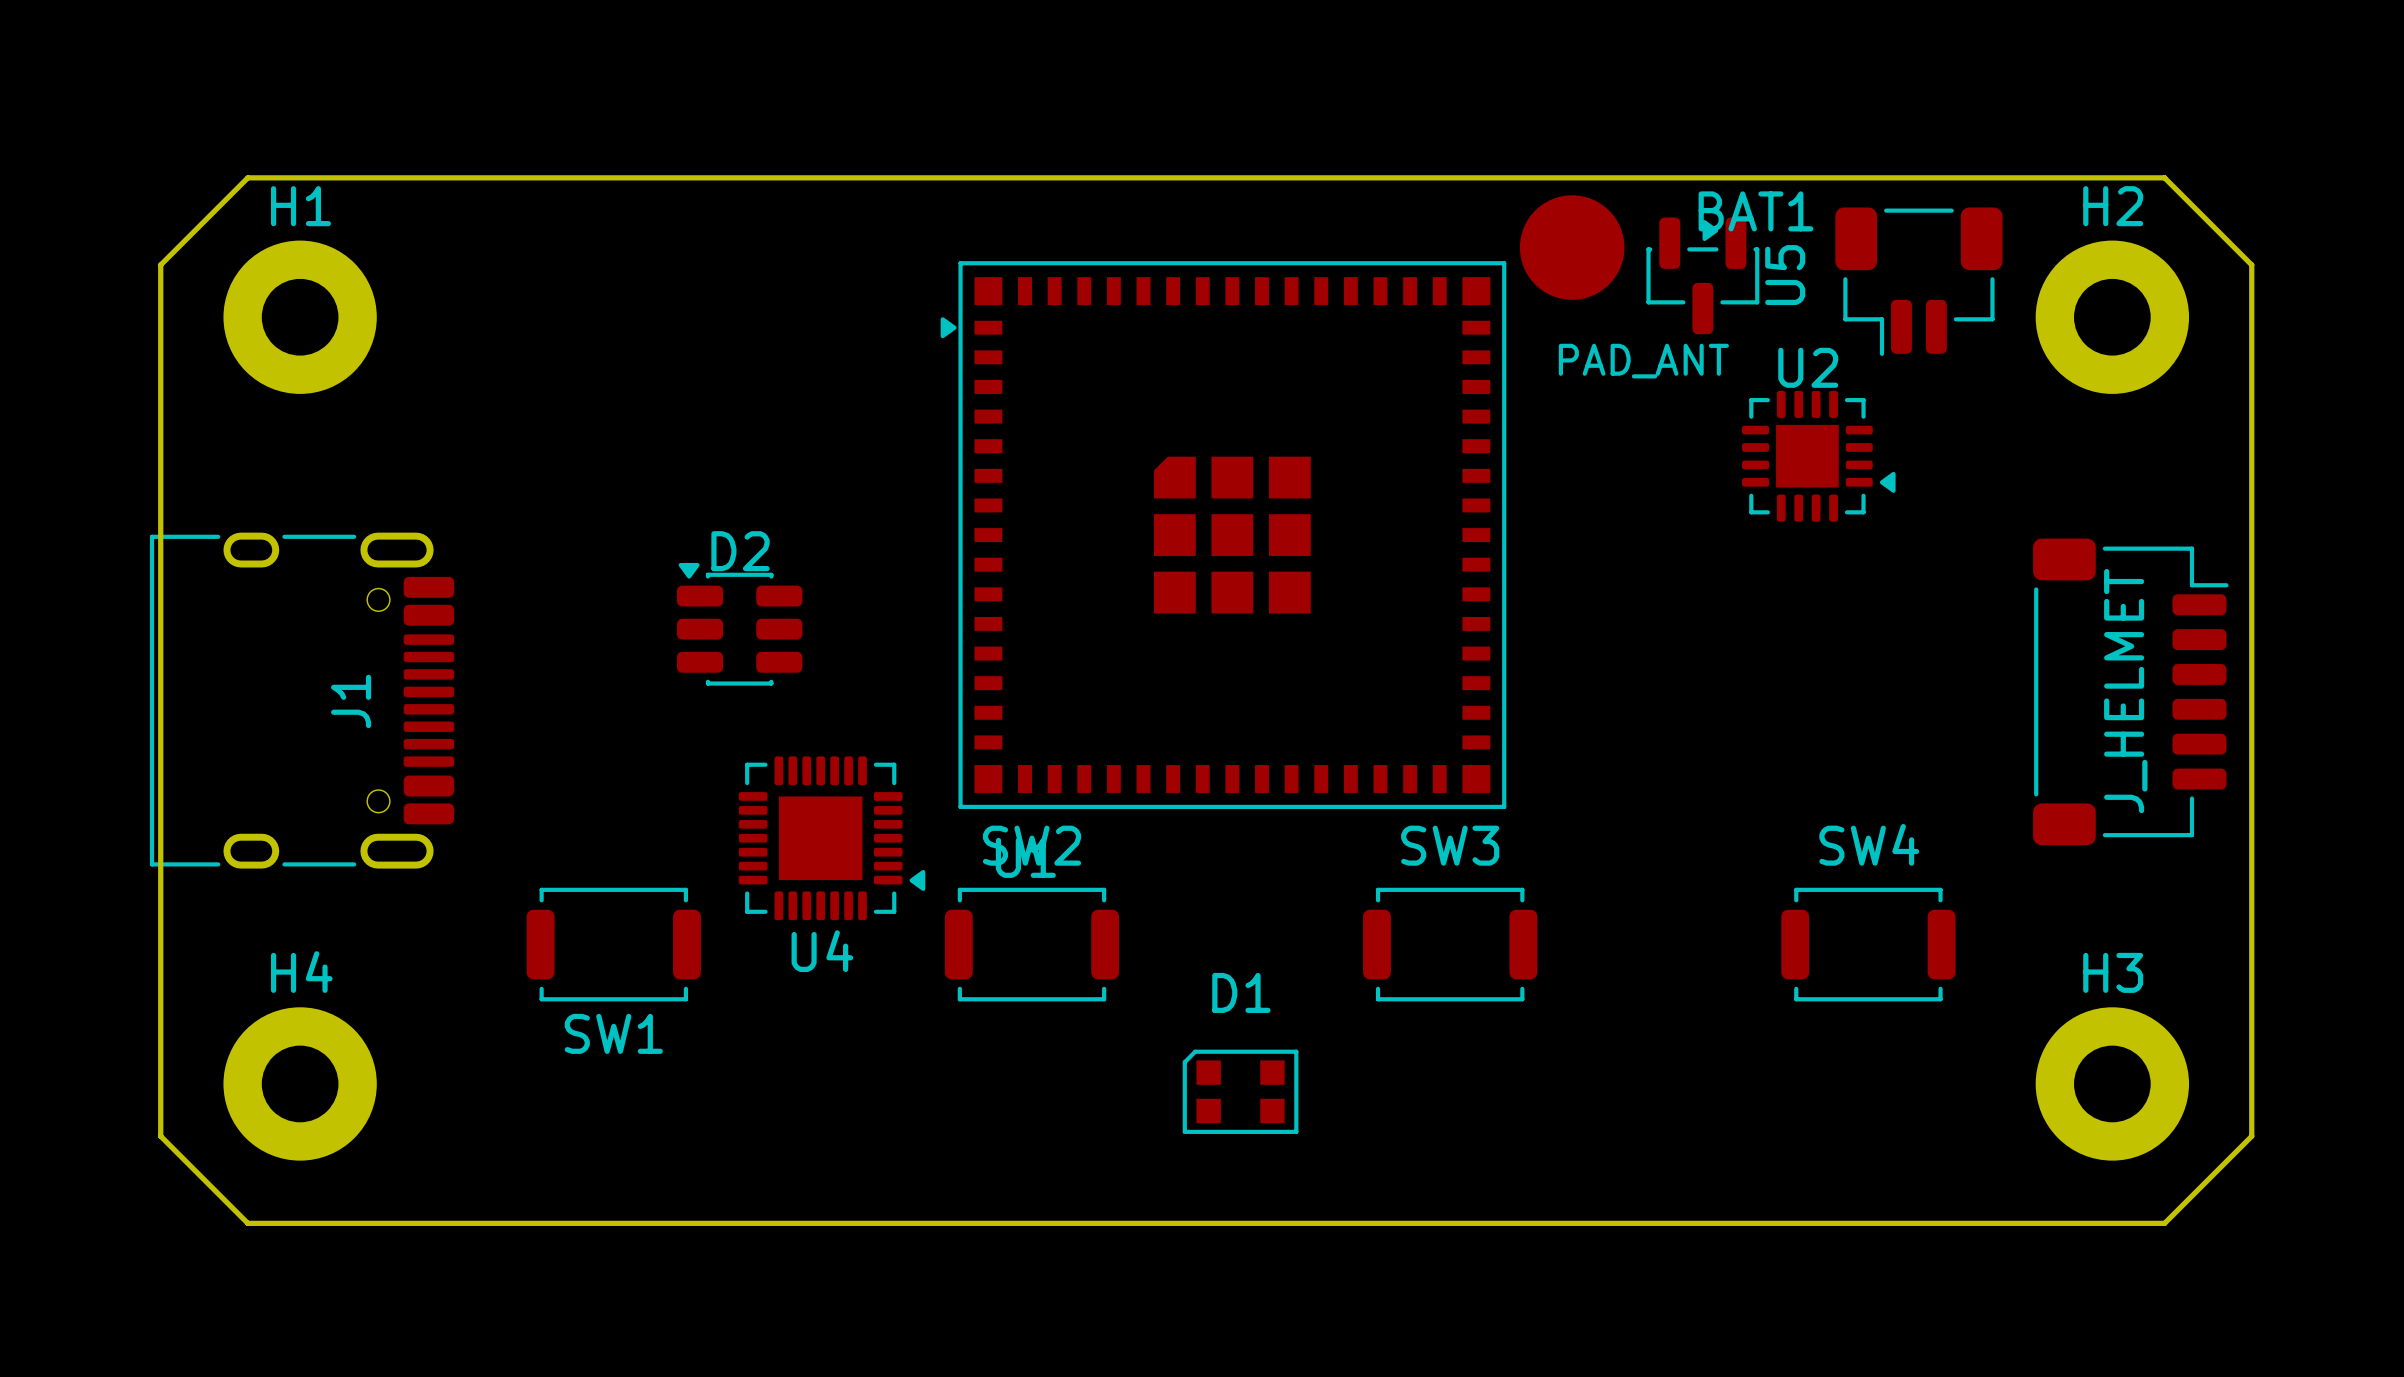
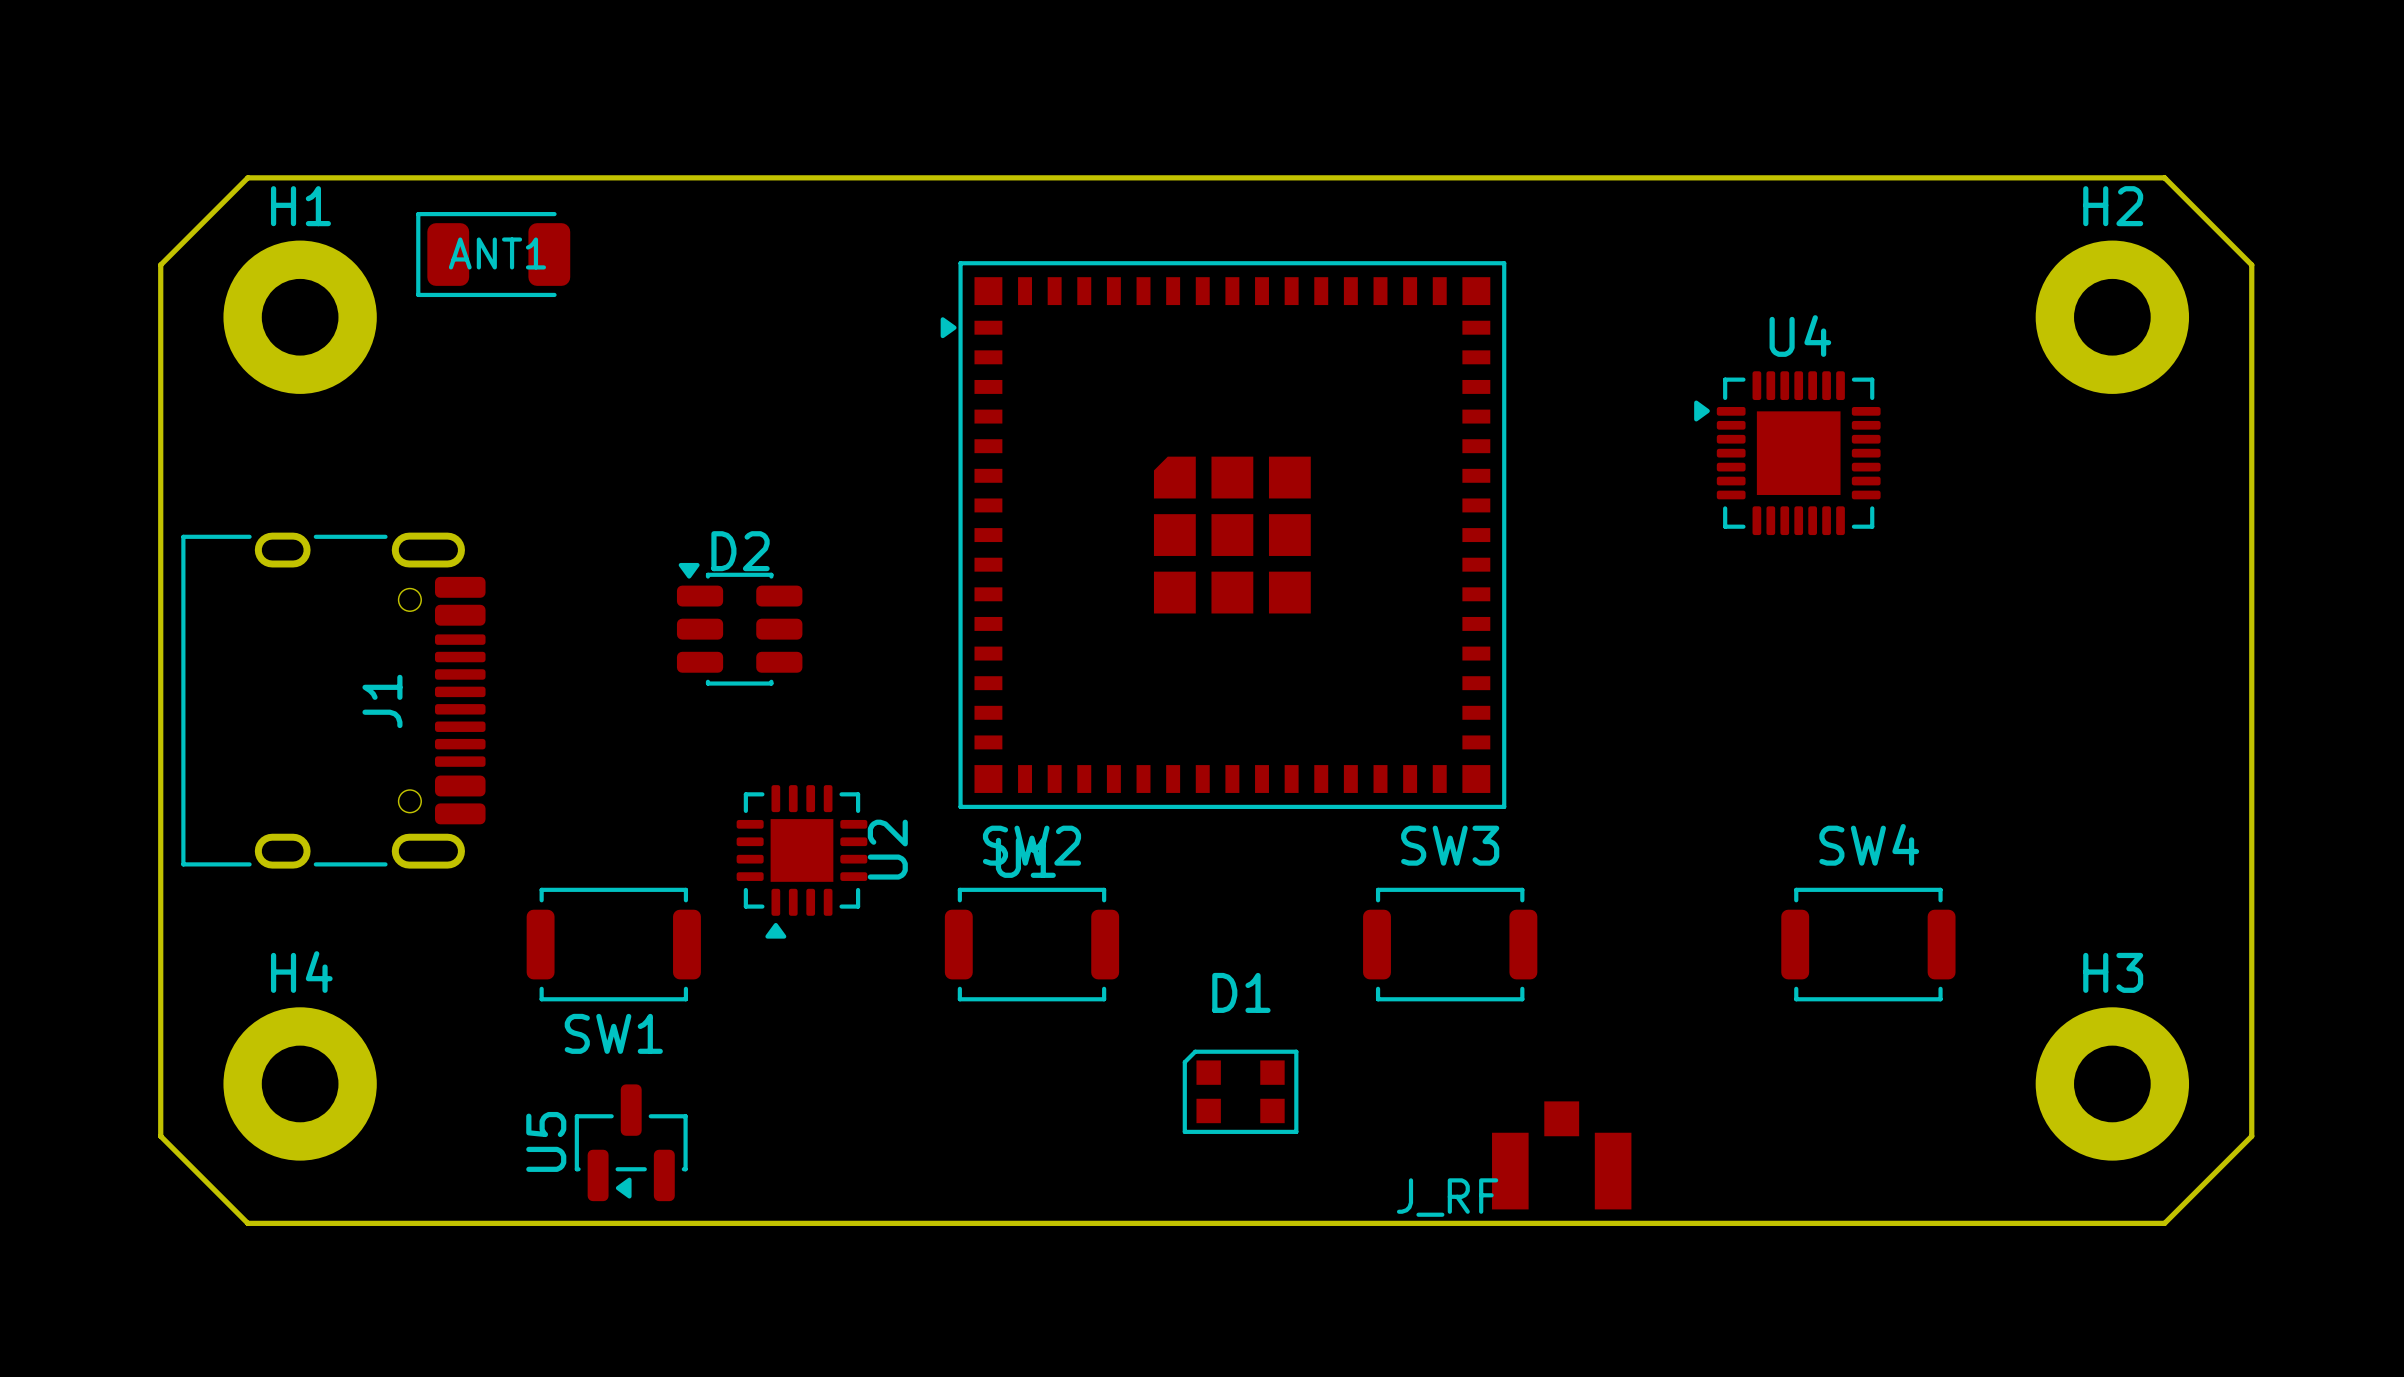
PAD_ANT: (1572, 247) -> none
ANT1: none -> (493, 254)
U5 rotation: 0° (1702, 275) -> 180° (631, 1142)
U5 position: (1702, 275) -> (631, 1142)
BAT1: (1918, 281) -> none
U2 rotation: 0° (1818, 456) -> 90° clockwise (801, 861)
U2 position: (1818, 456) -> (801, 861)
J_HELMET: (2130, 691) -> none
J1 position: (302, 700) -> (333, 700)
U4 rotation: 0° (832, 838) -> 180° (1787, 453)
U4 position: (832, 838) -> (1787, 453)
J_RF: none -> (1561, 1155)

